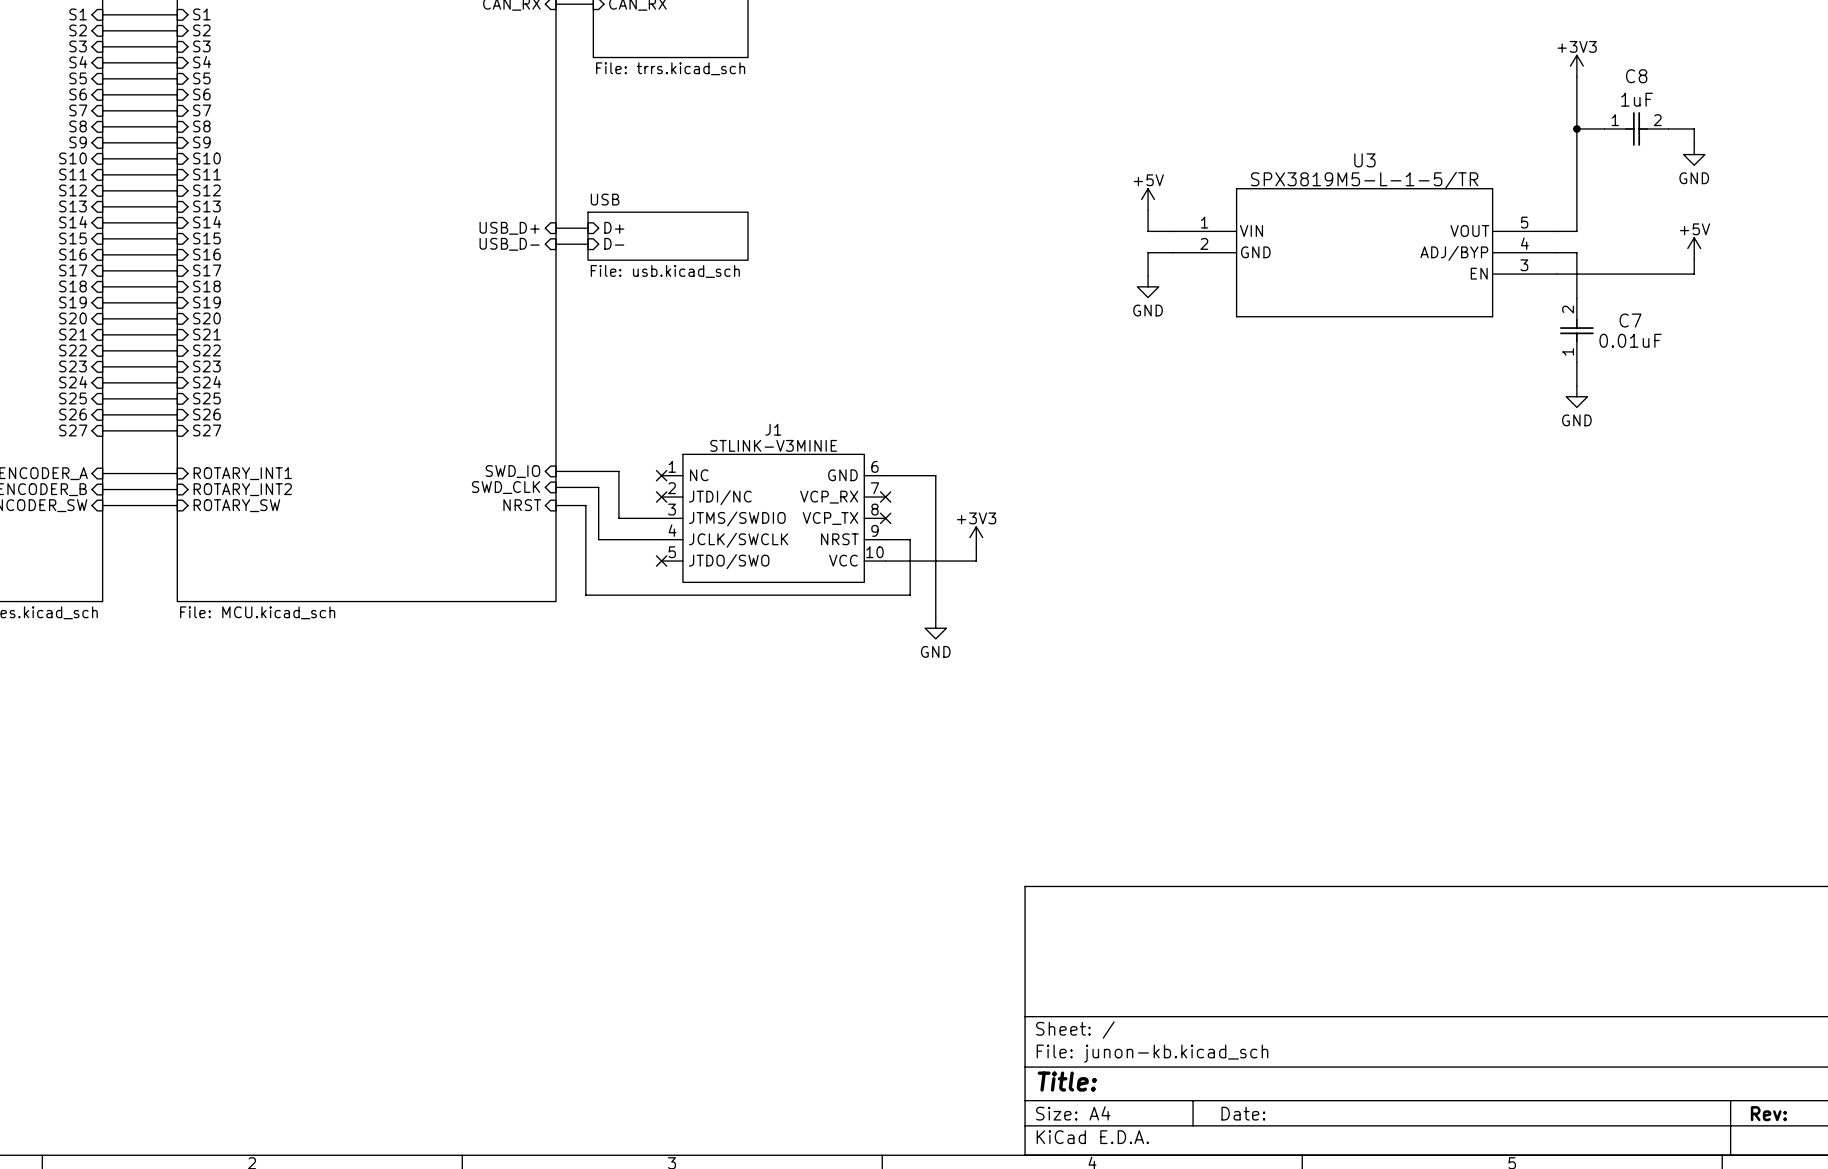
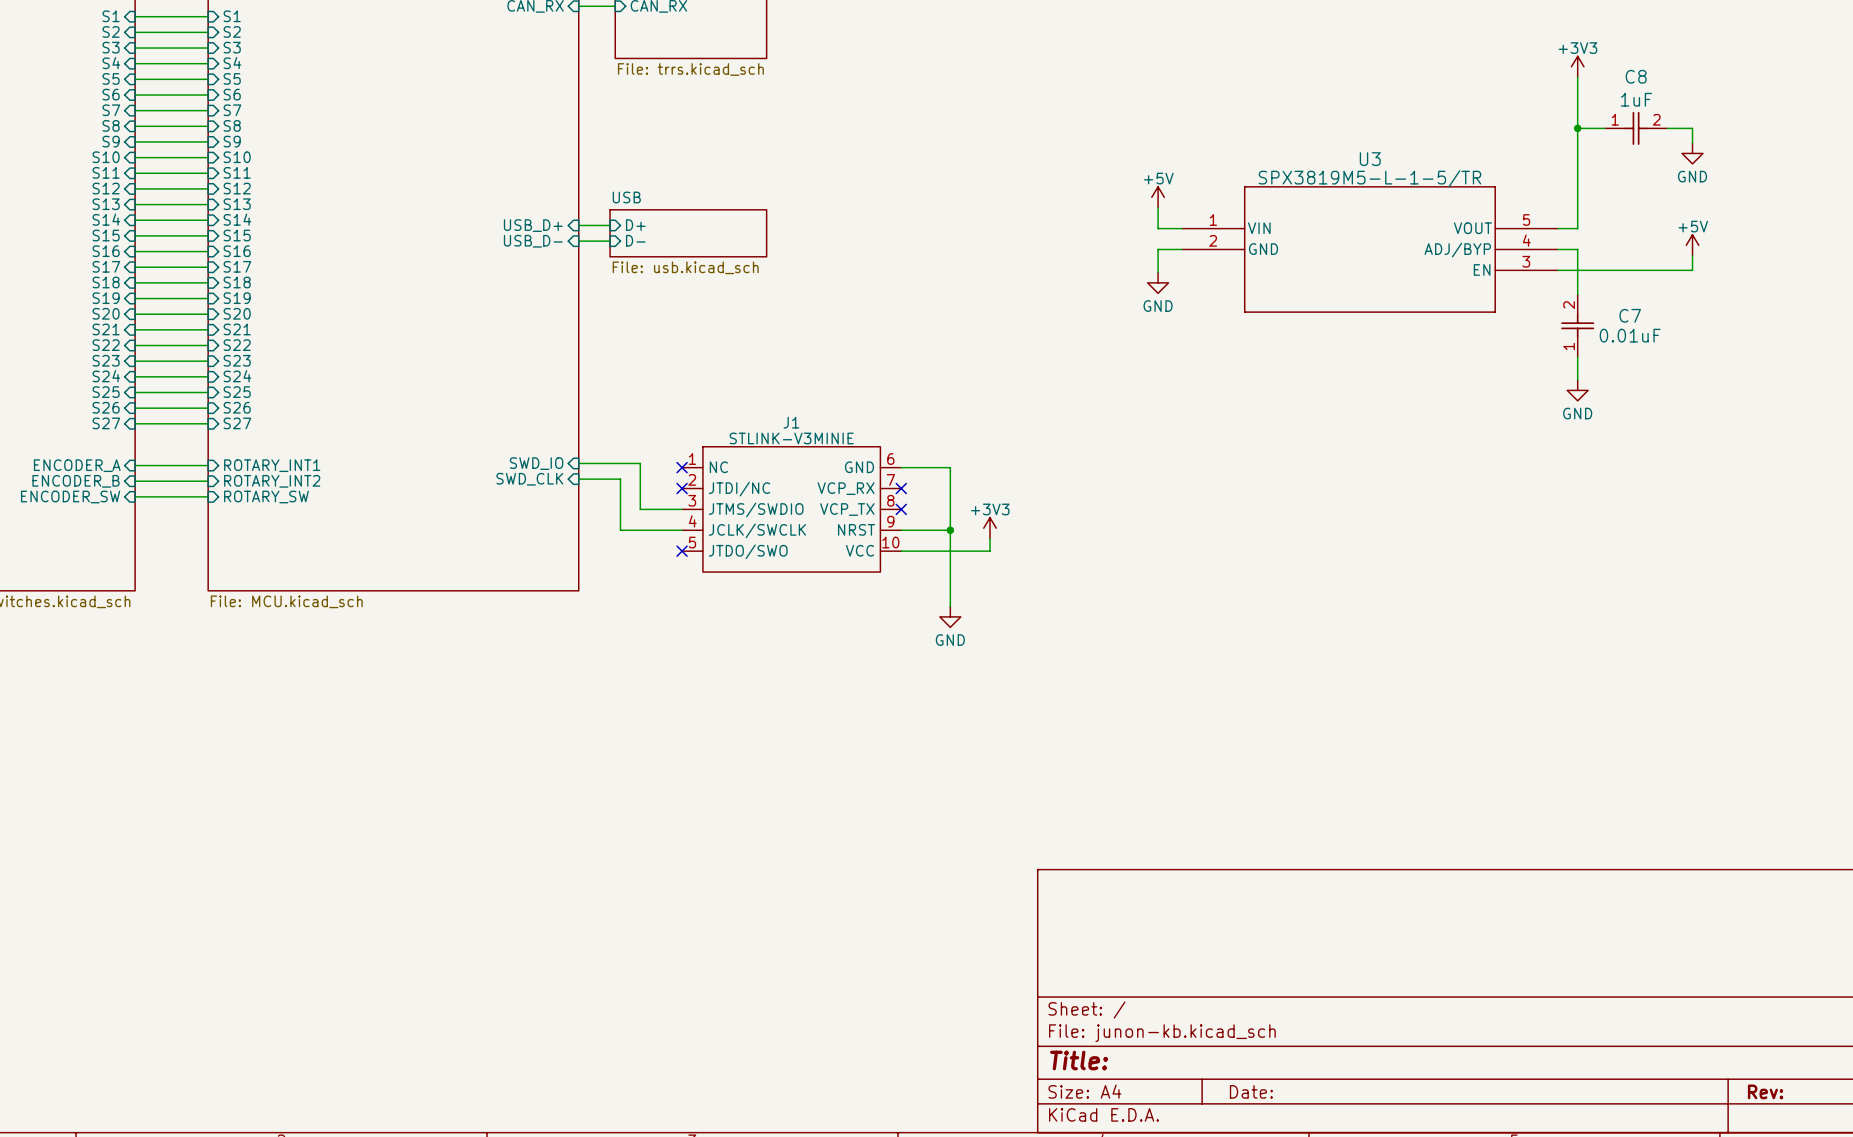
sheet pin: NRST (522, 505) -> none
wire: (556, 505) (585, 505) (585, 595) (910, 595) (910, 539) -> (950, 530) (925, 530)
junction: none -> (950, 530)

